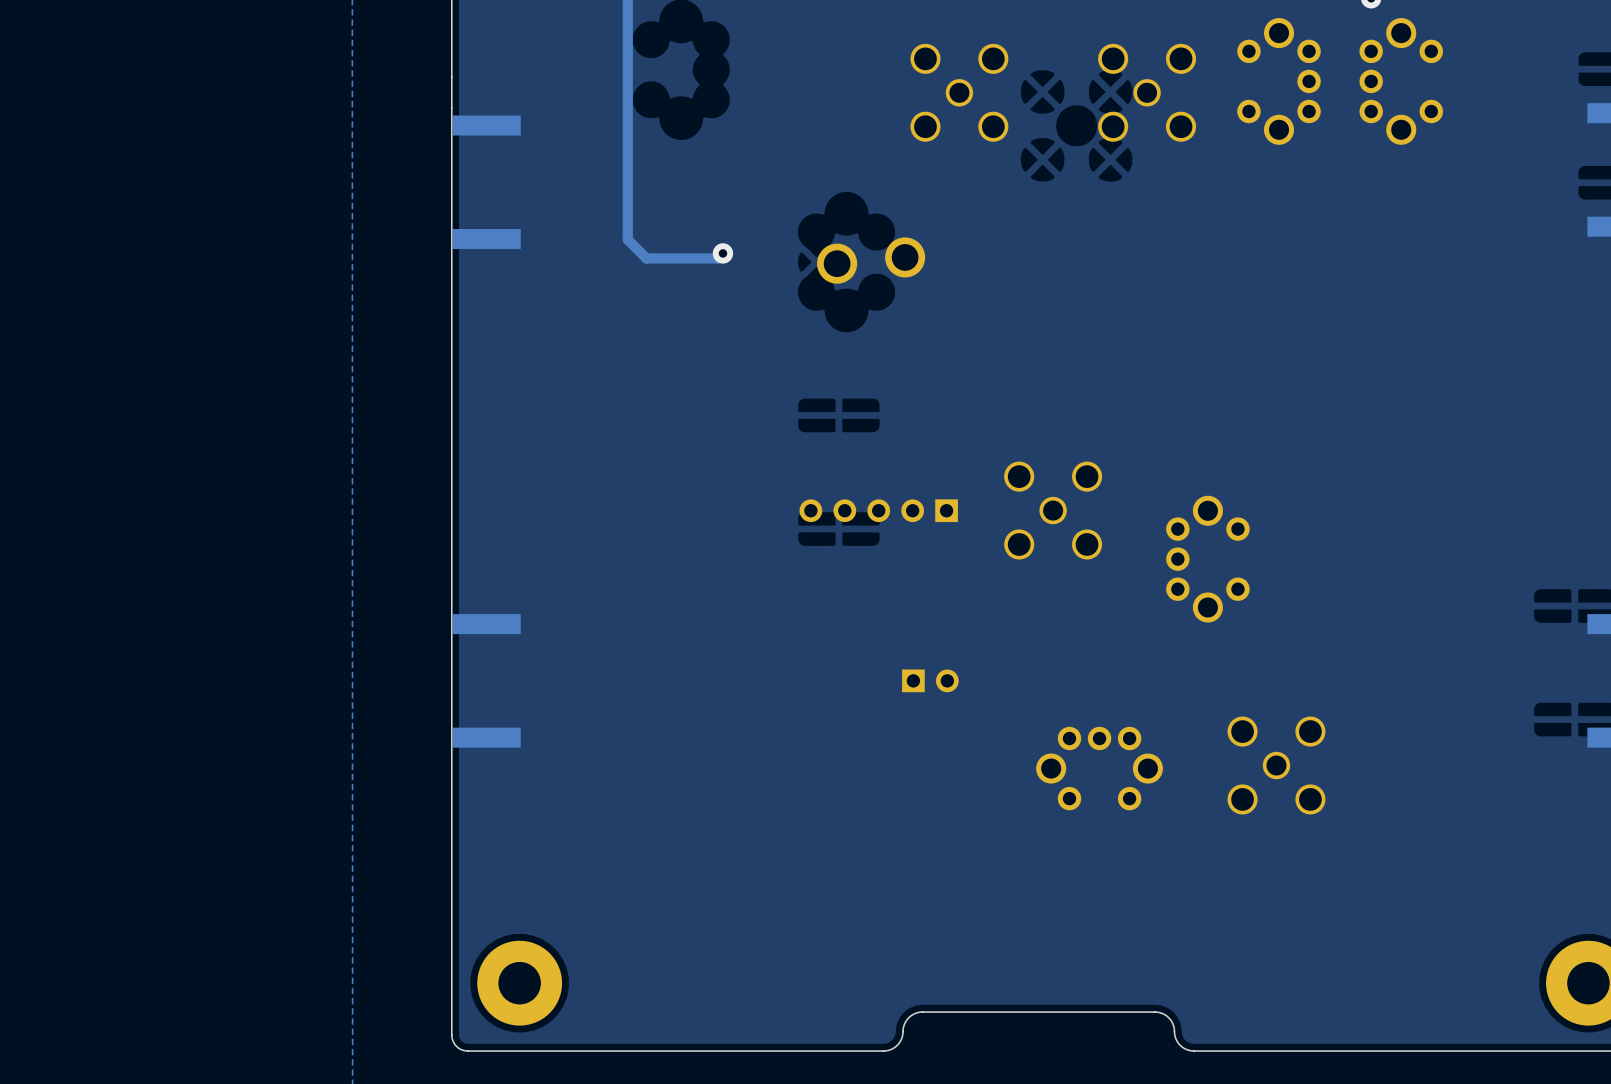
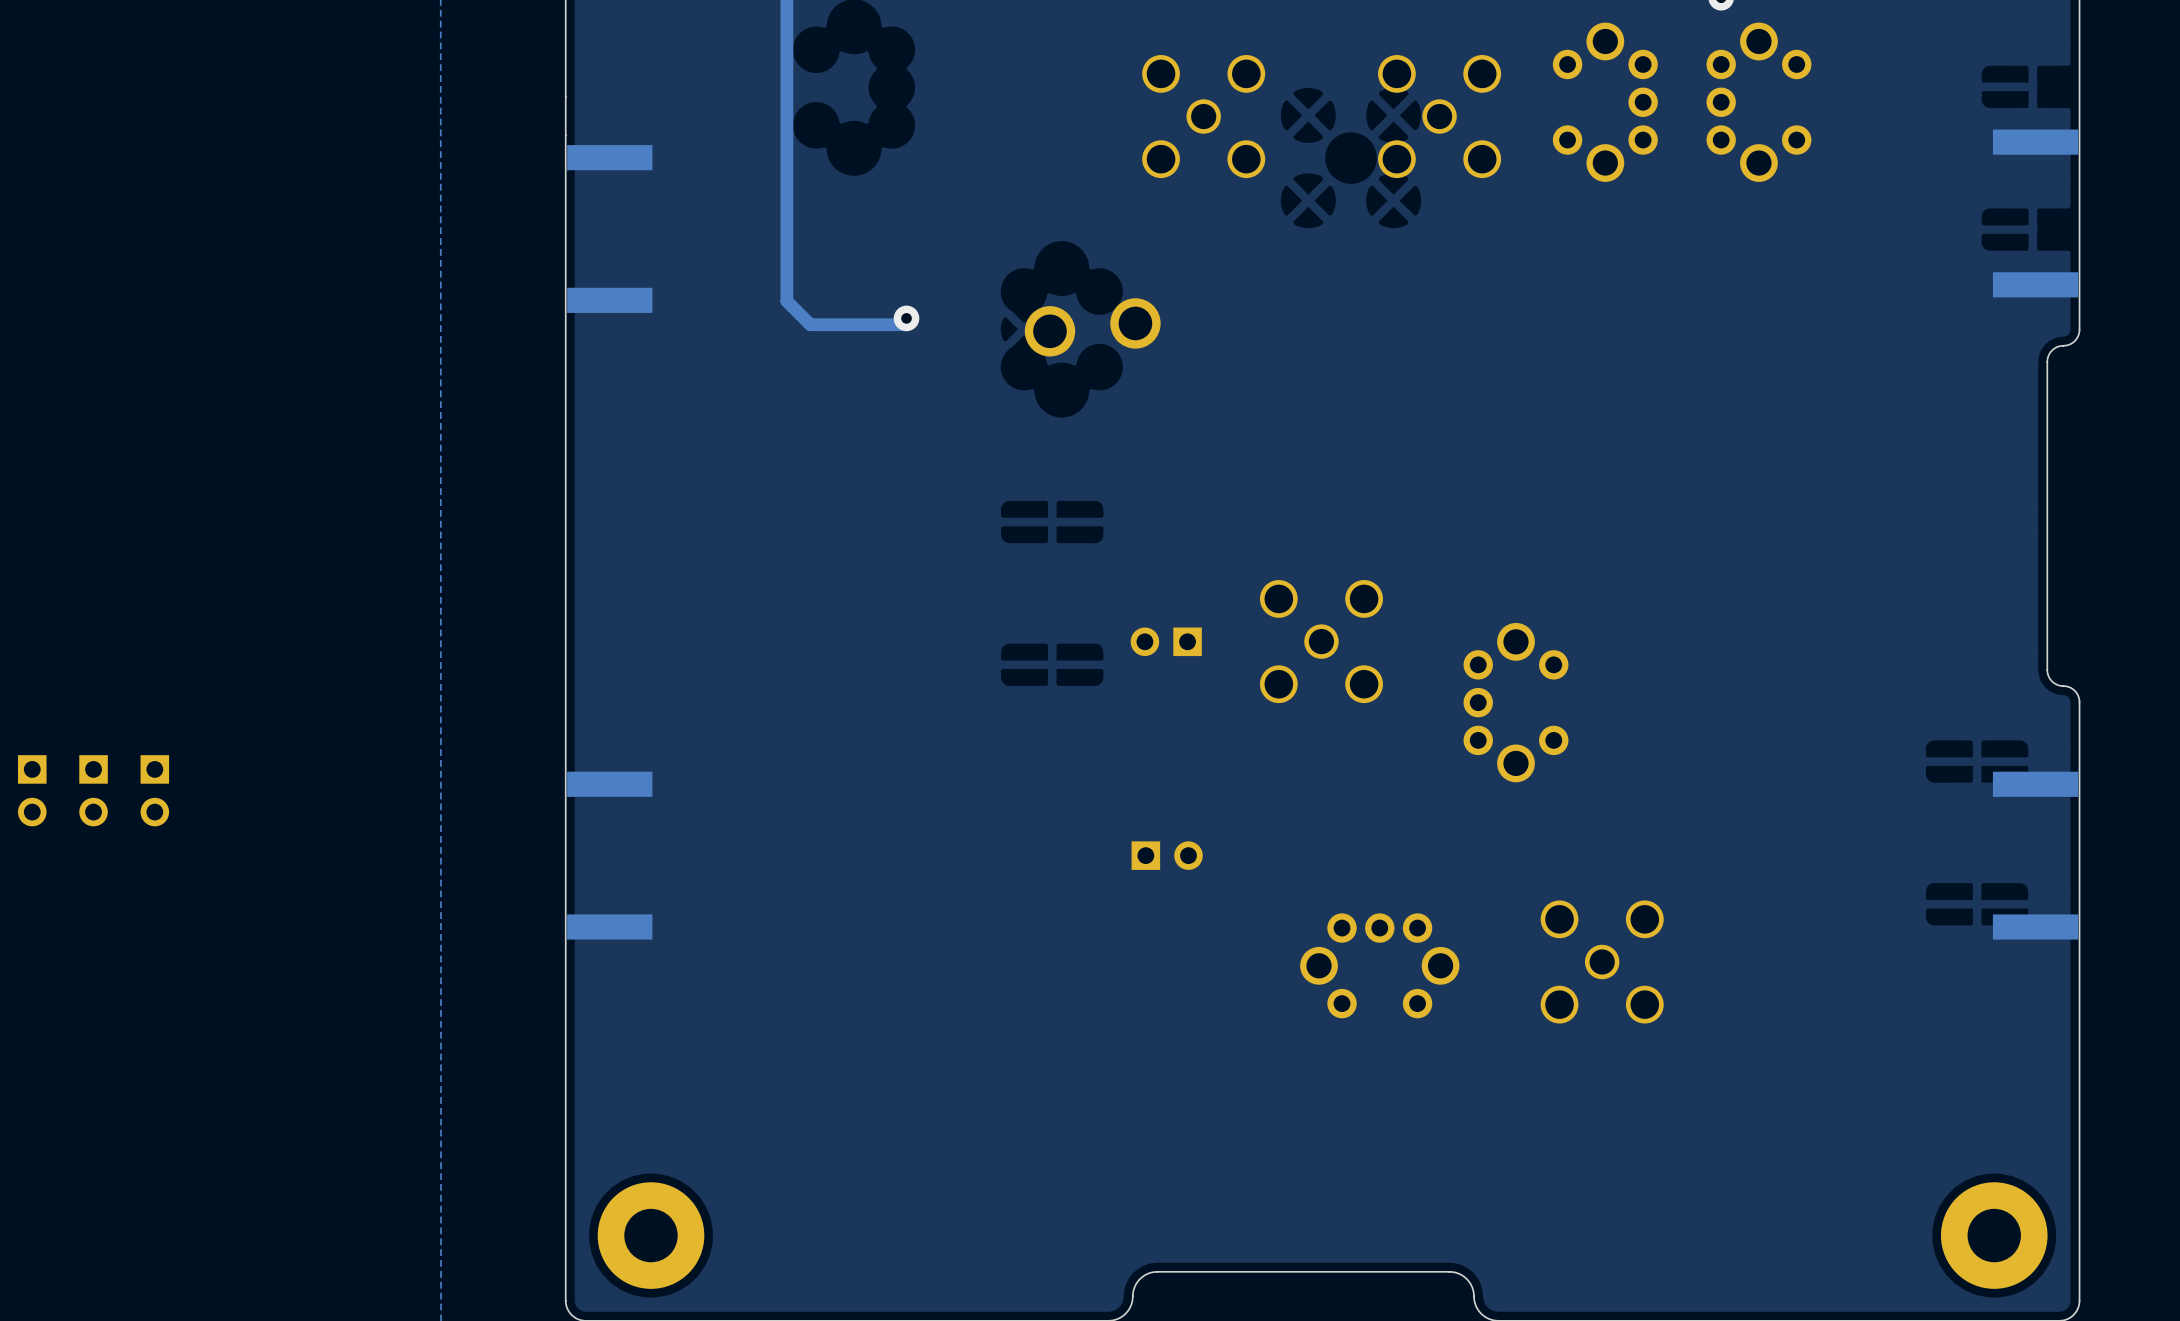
part: (878, 510) -> none
part: none -> (32, 790)
part: none -> (93, 790)
part: none -> (154, 790)

